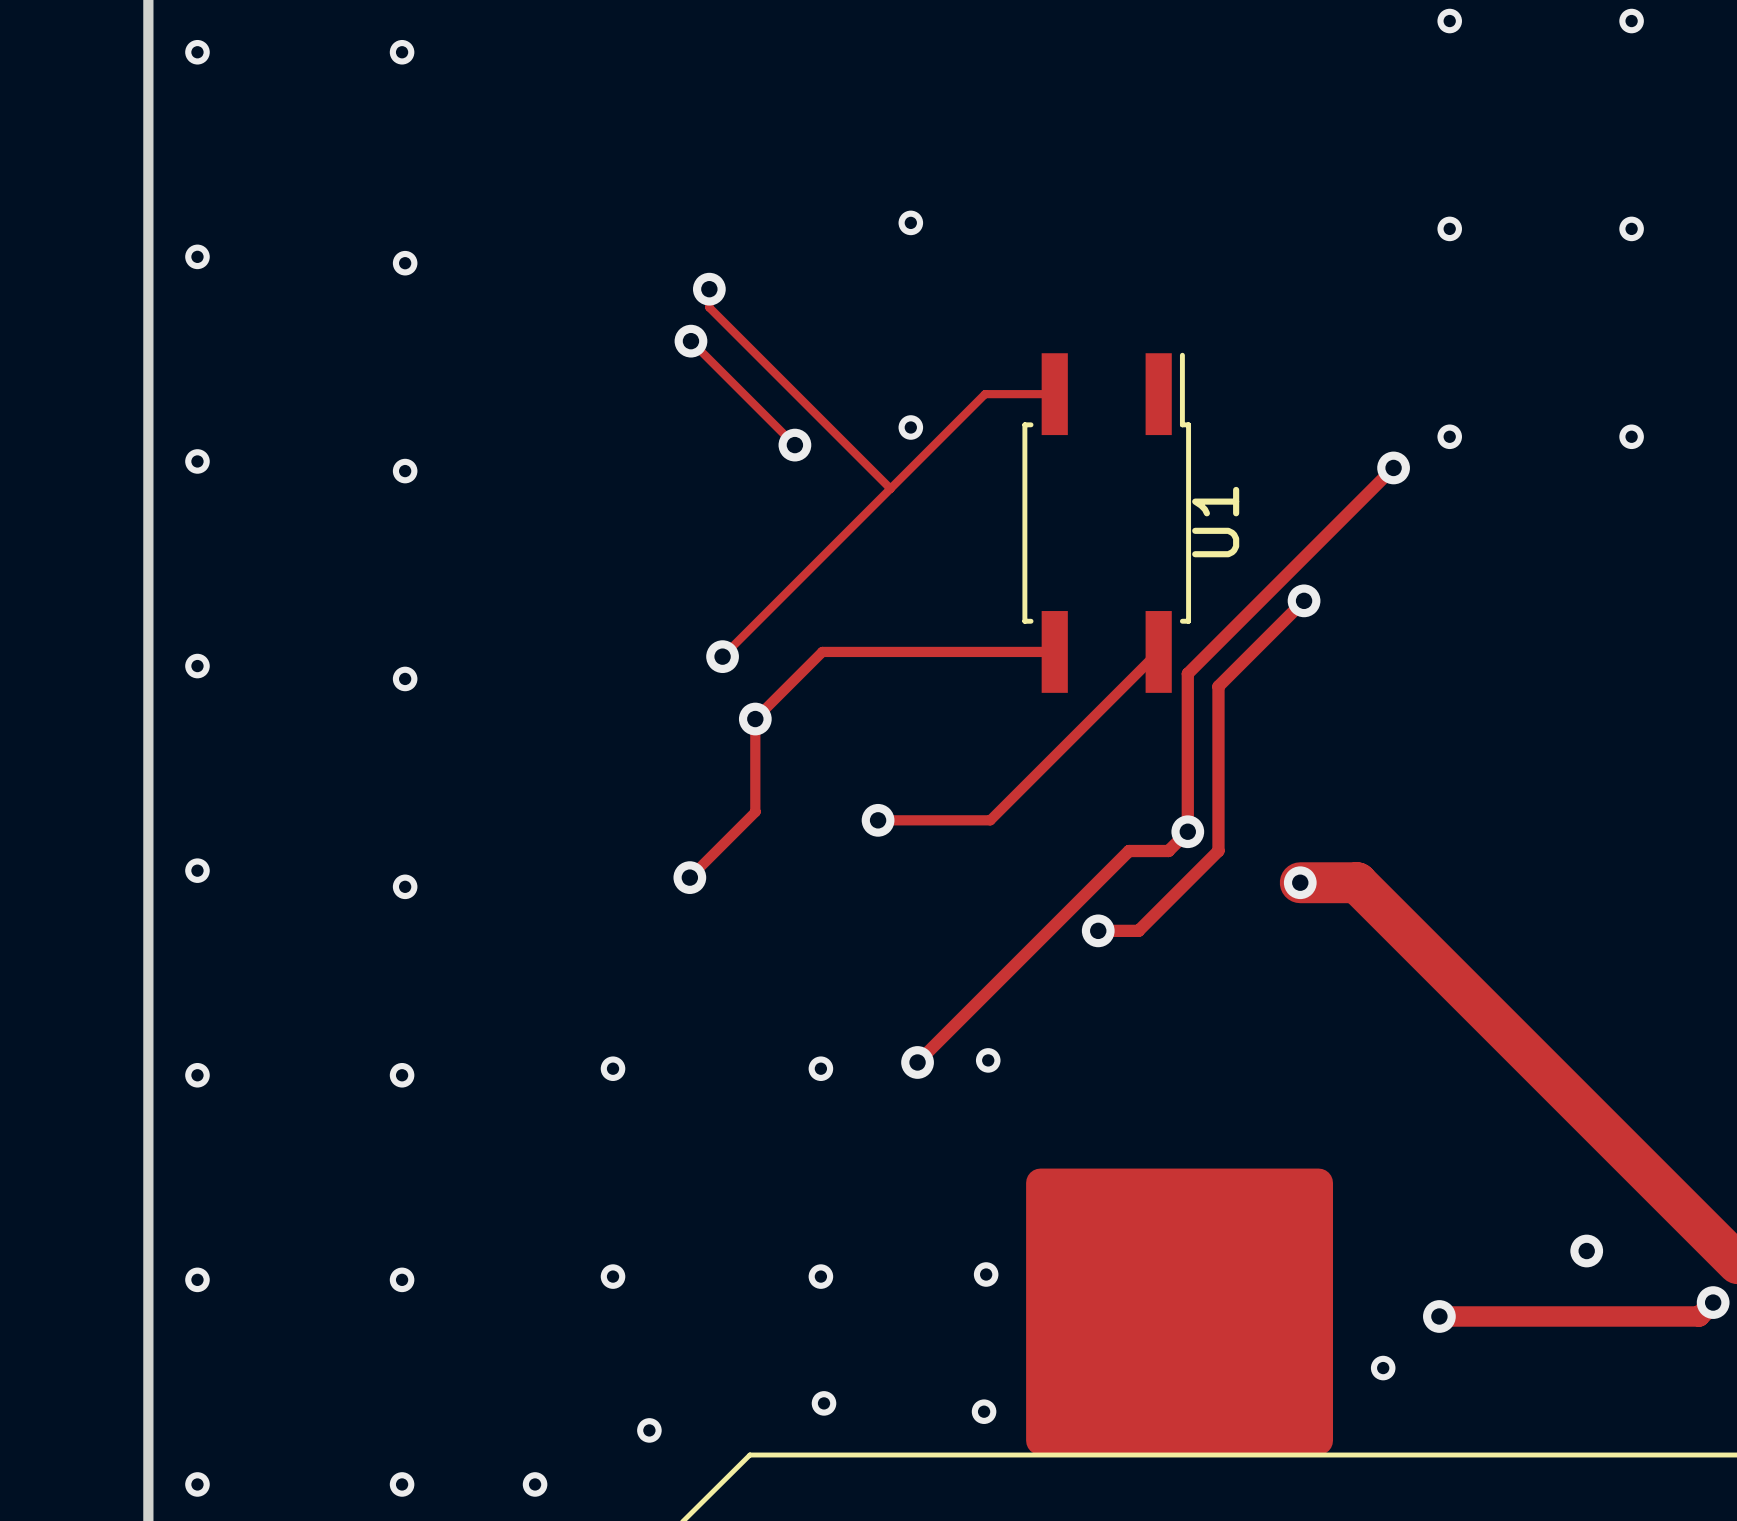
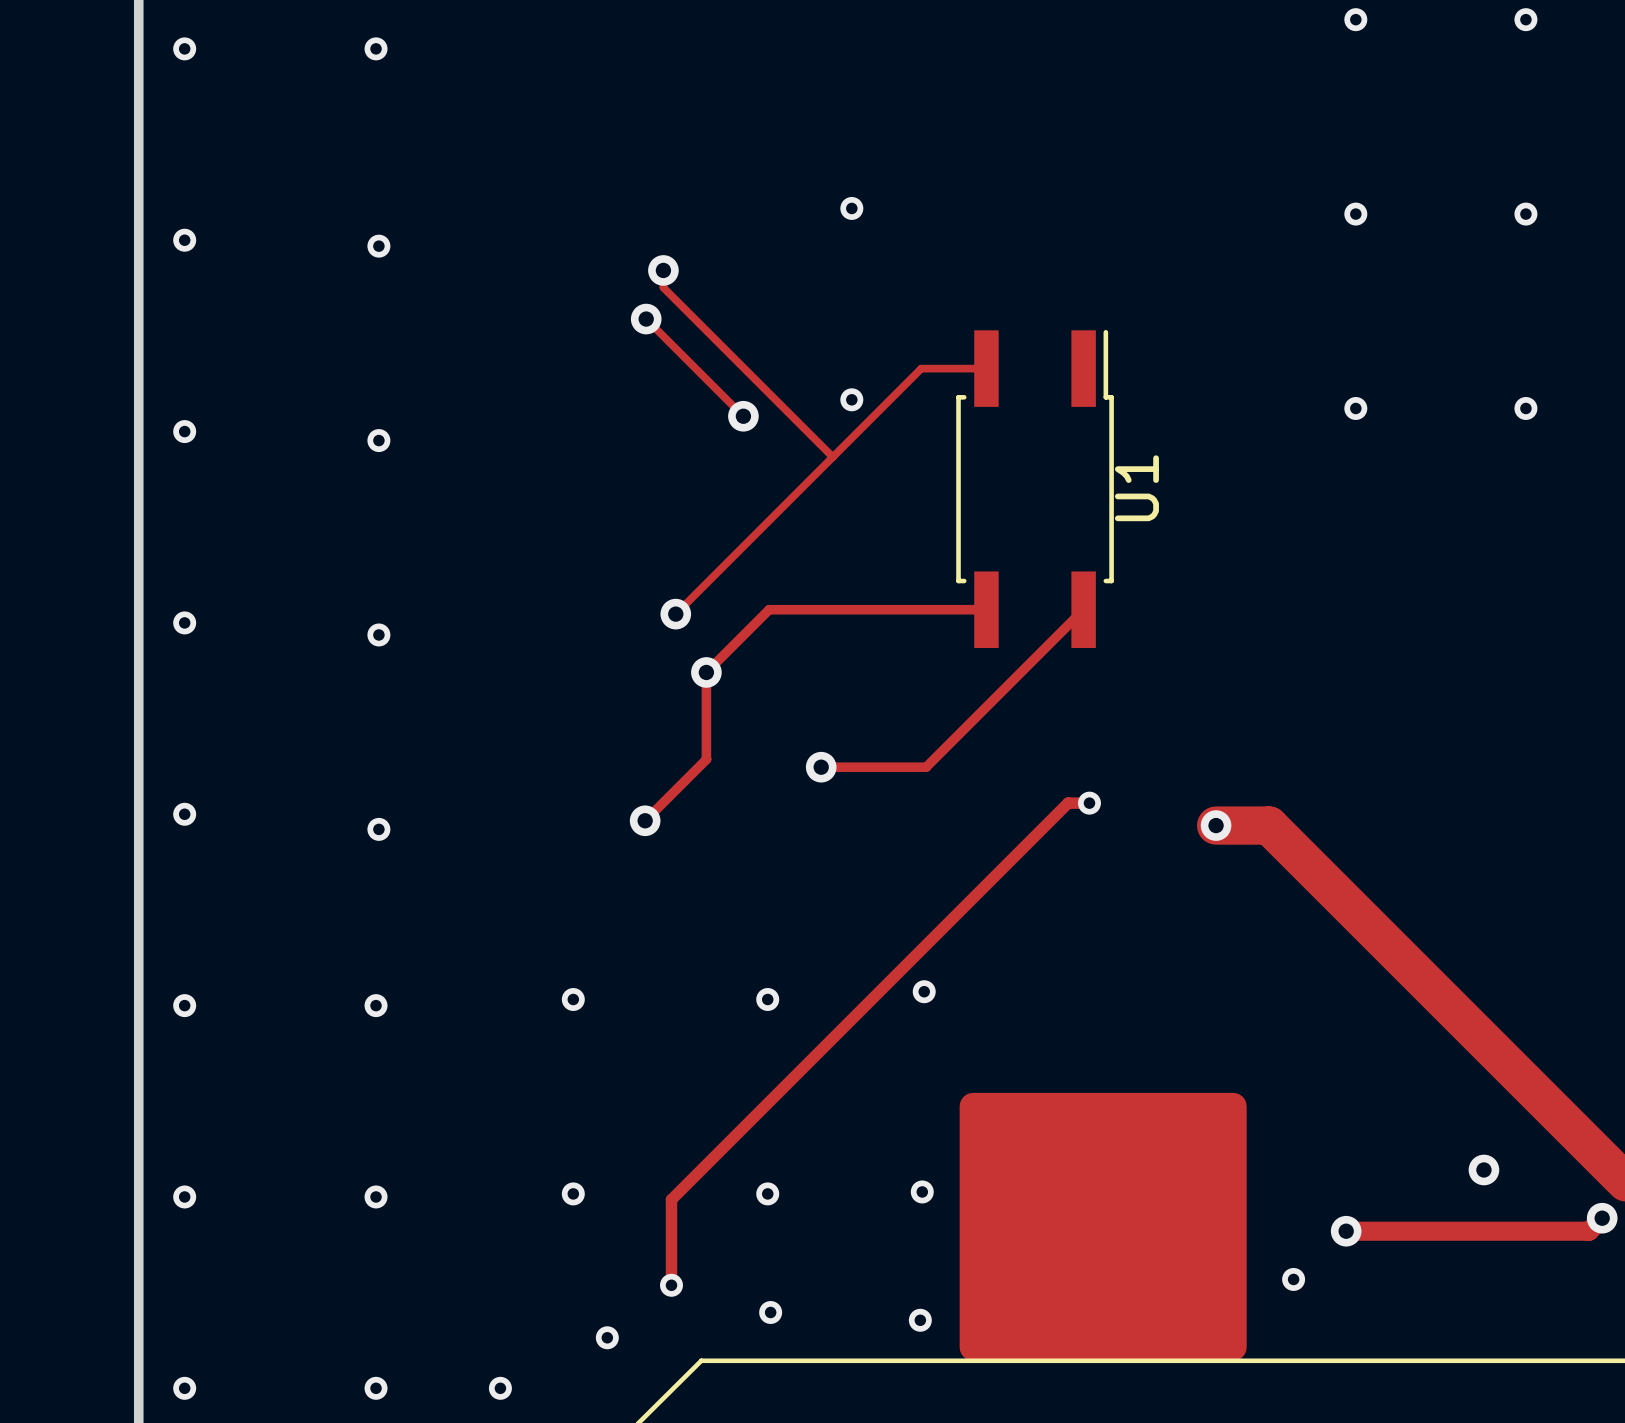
track: (1393, 467) (1187, 673) (1187, 831) (1168, 851) (1129, 851) (917, 1062) -> none
via: (1393, 467) -> none
track: (1304, 600) (1218, 686) (1218, 850) (1138, 930) (1098, 930) -> none
via: (1304, 600) -> none
via position: (1187, 831) -> (1089, 803)
track: none -> (1089, 803) (1068, 803) (671, 1199) (671, 1285)
via: (1098, 930) -> none
via: (917, 1062) -> none
via: none -> (671, 1285)

